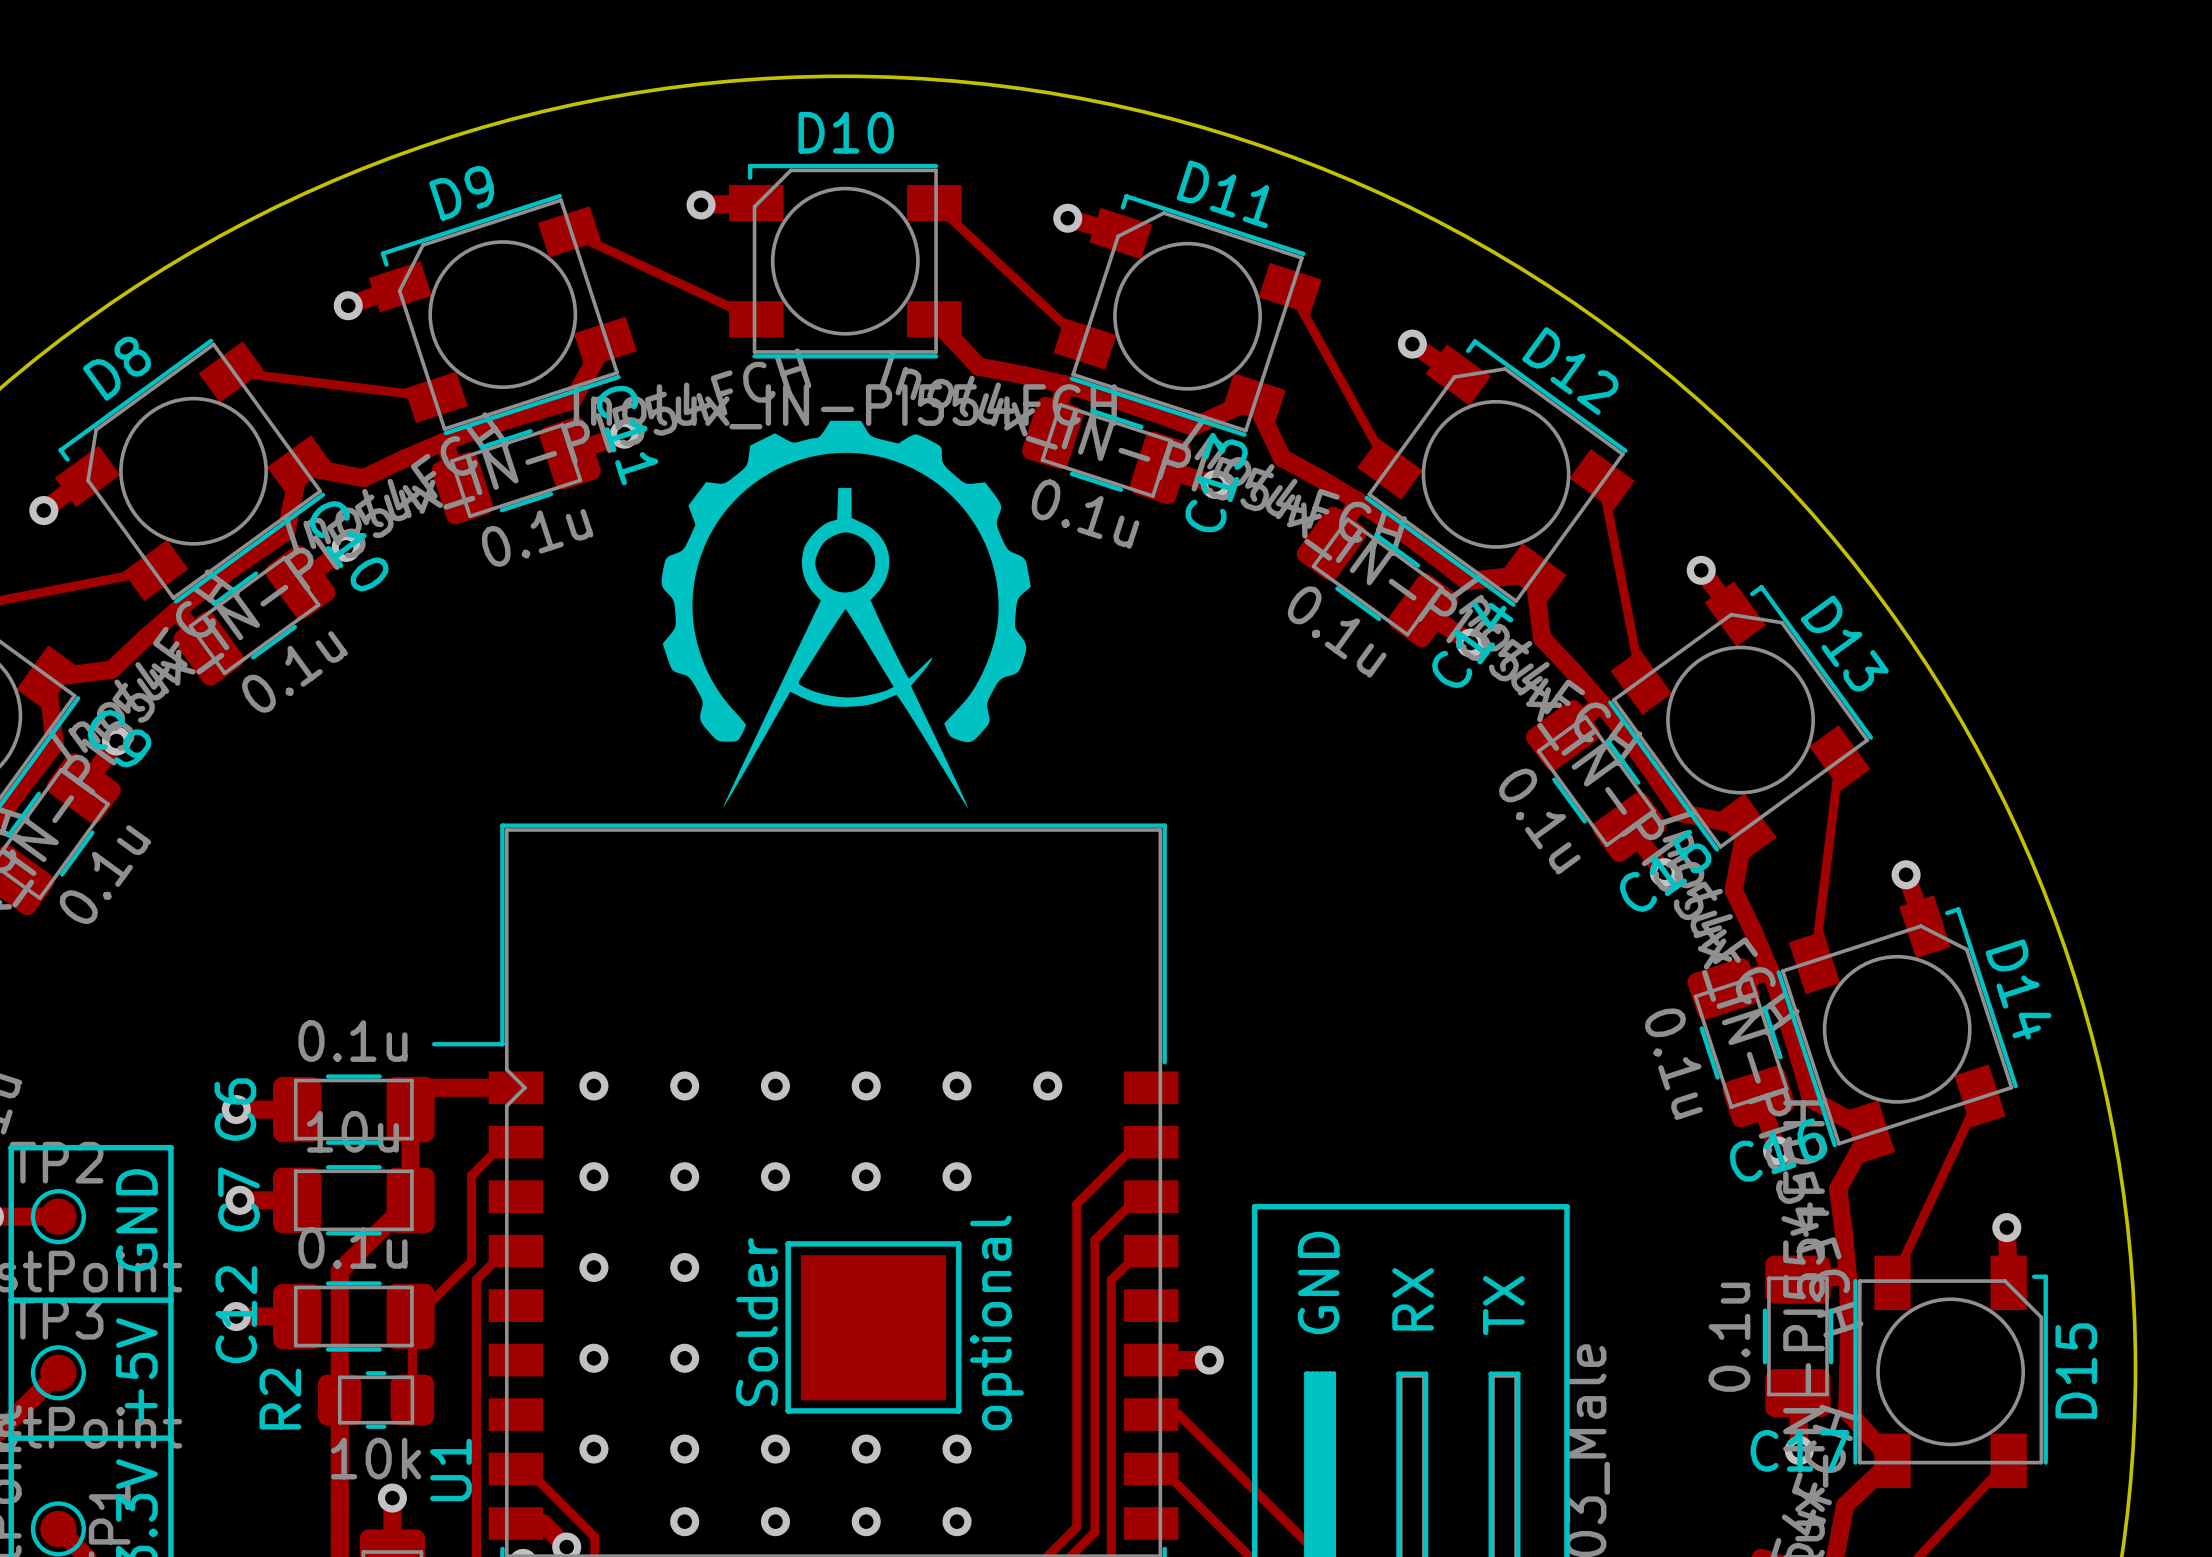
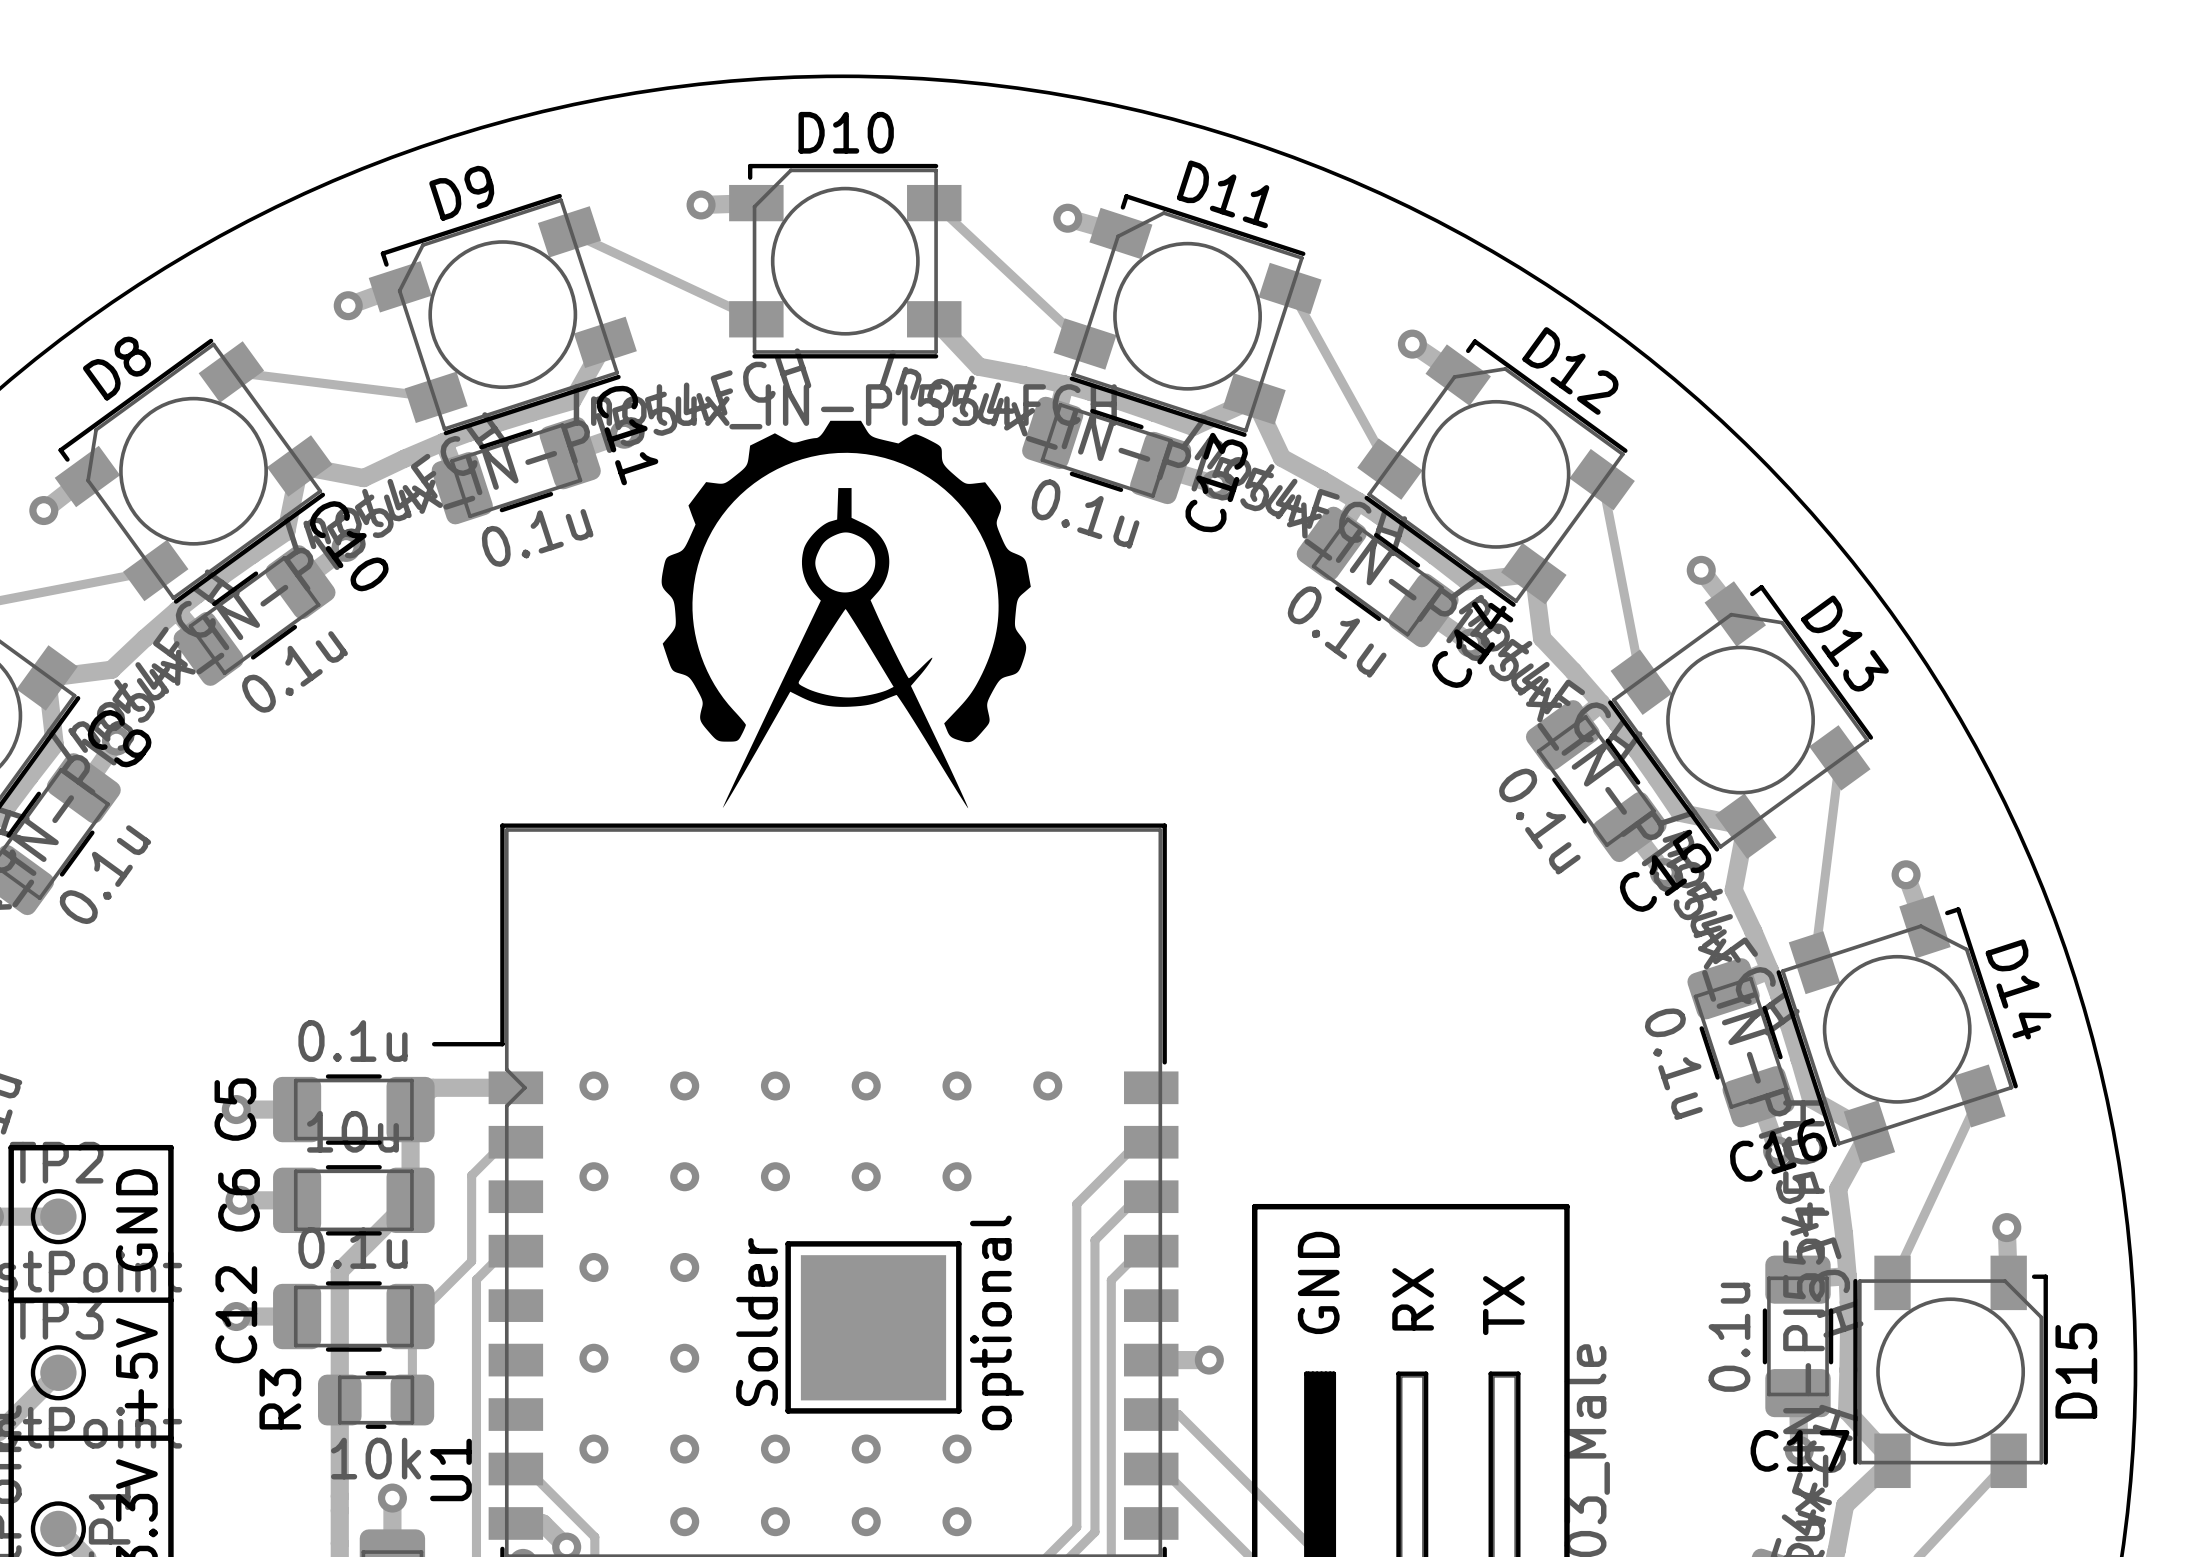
C6 name: C6 (235, 1109) -> C5 (235, 1109)
C7 name: C7 (239, 1199) -> C6 (239, 1200)
R2 name: R2 (280, 1399) -> R3 (280, 1399)

